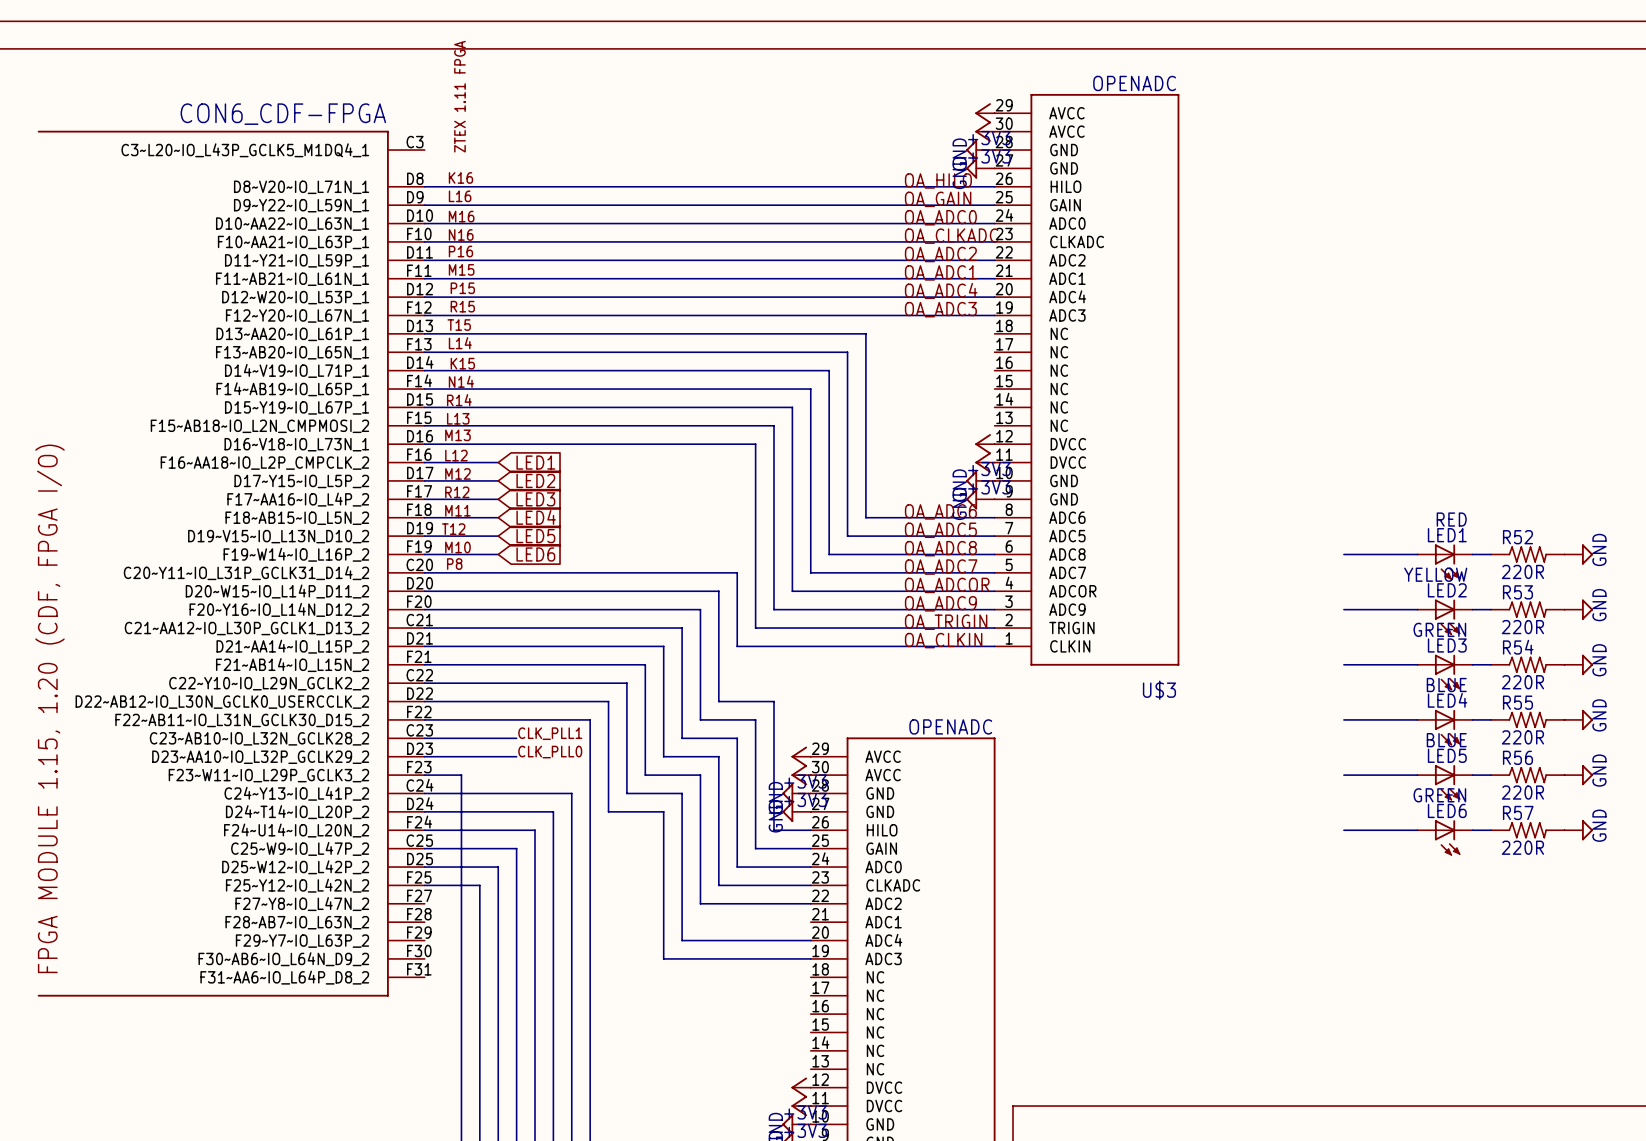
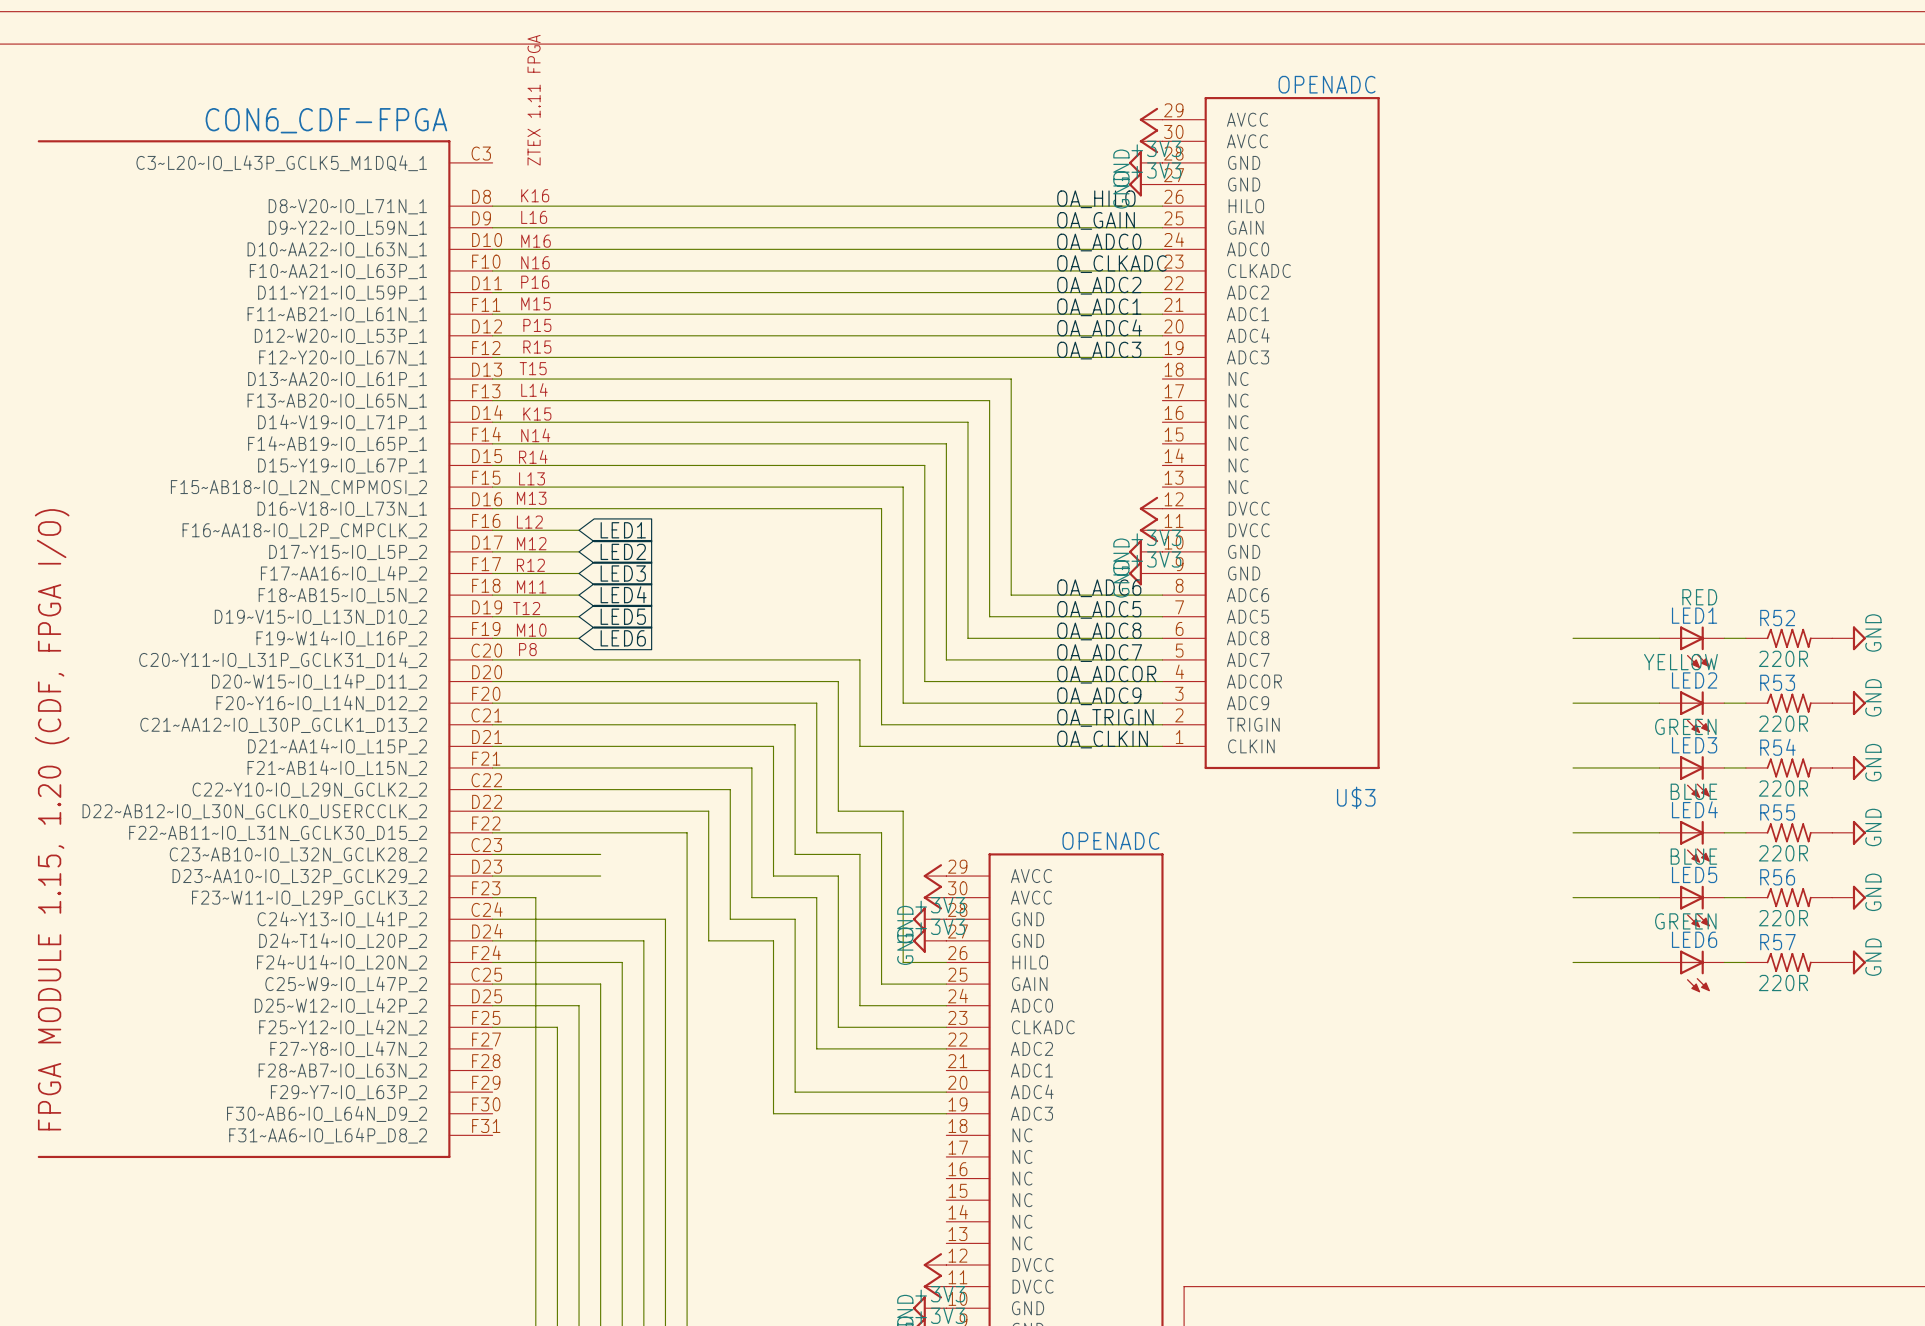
label: CLK_PLL1 (550, 733) -> none
label: CLK_PLL0 (550, 752) -> none

